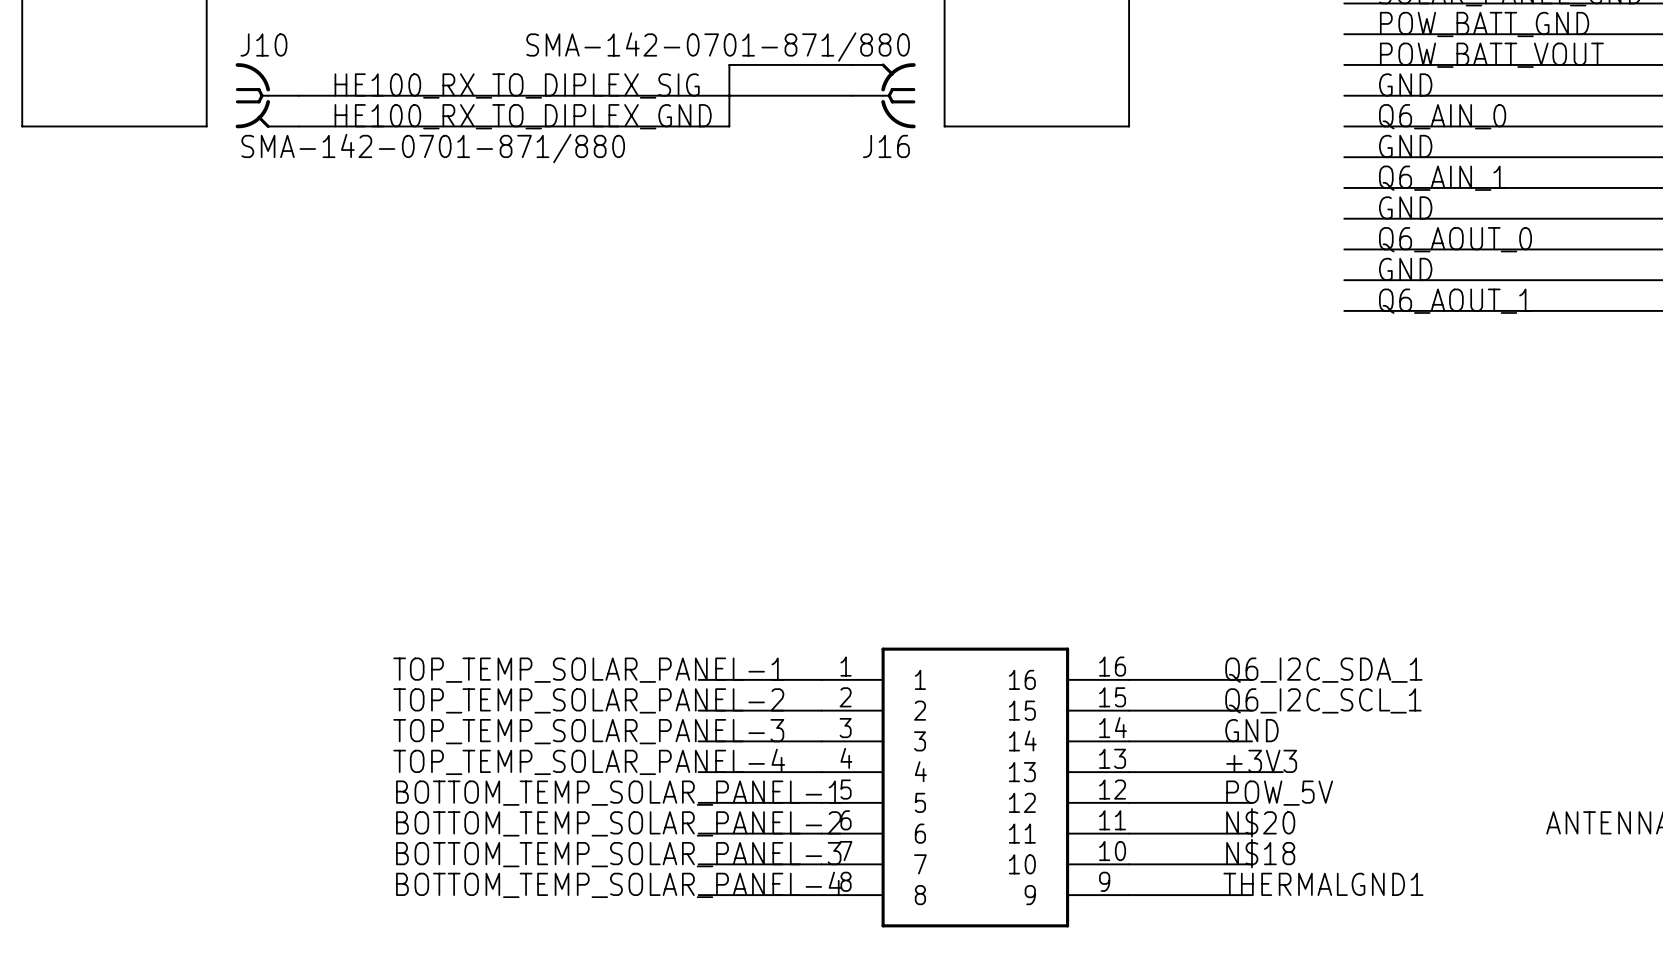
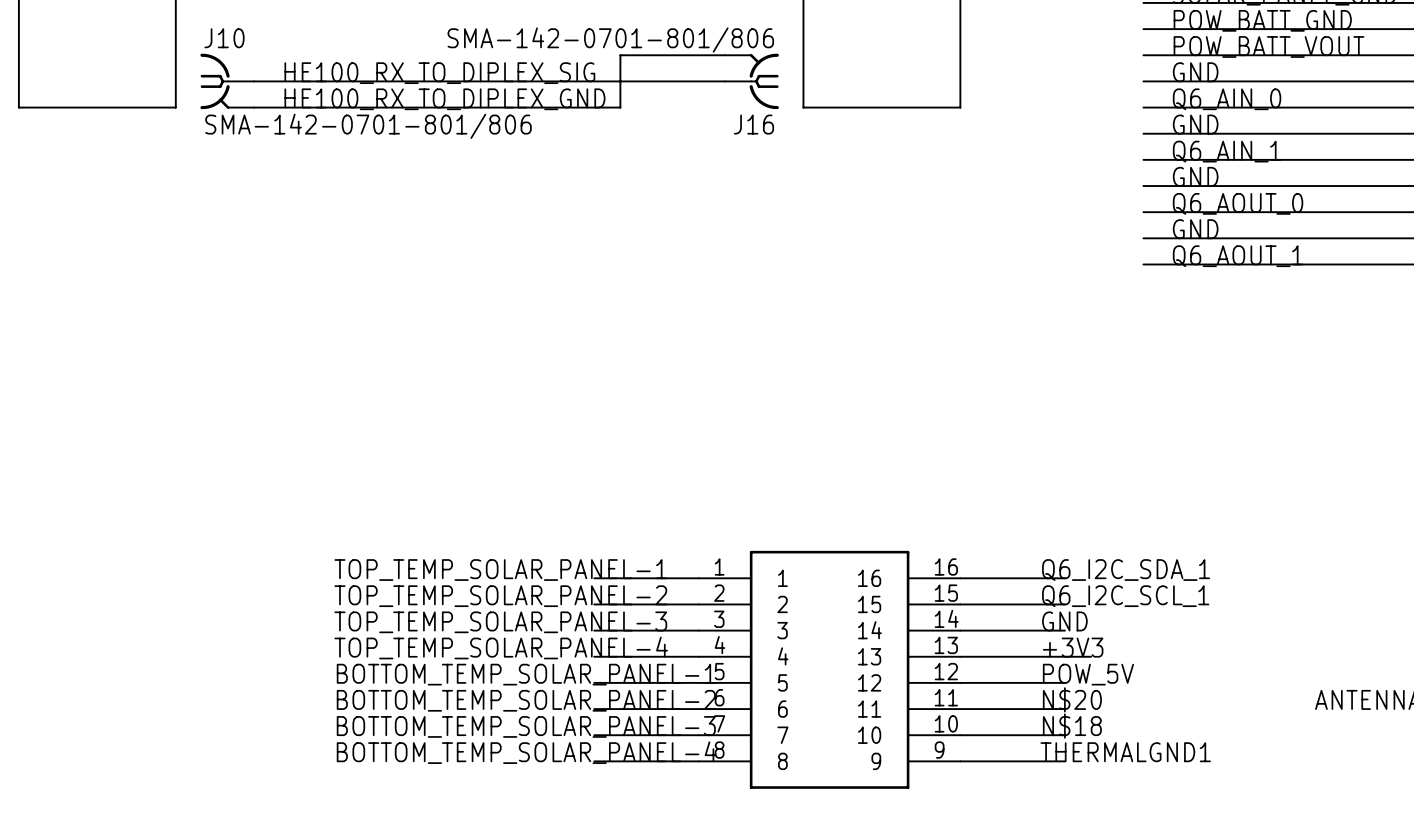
J16 value: SMA-142-0701-871/880 (718, 47) -> SMA-142-0701-801/806 (610, 40)
J10 value: SMA-142-0701-871/880 (433, 148) -> SMA-142-0701-801/806 (368, 126)

